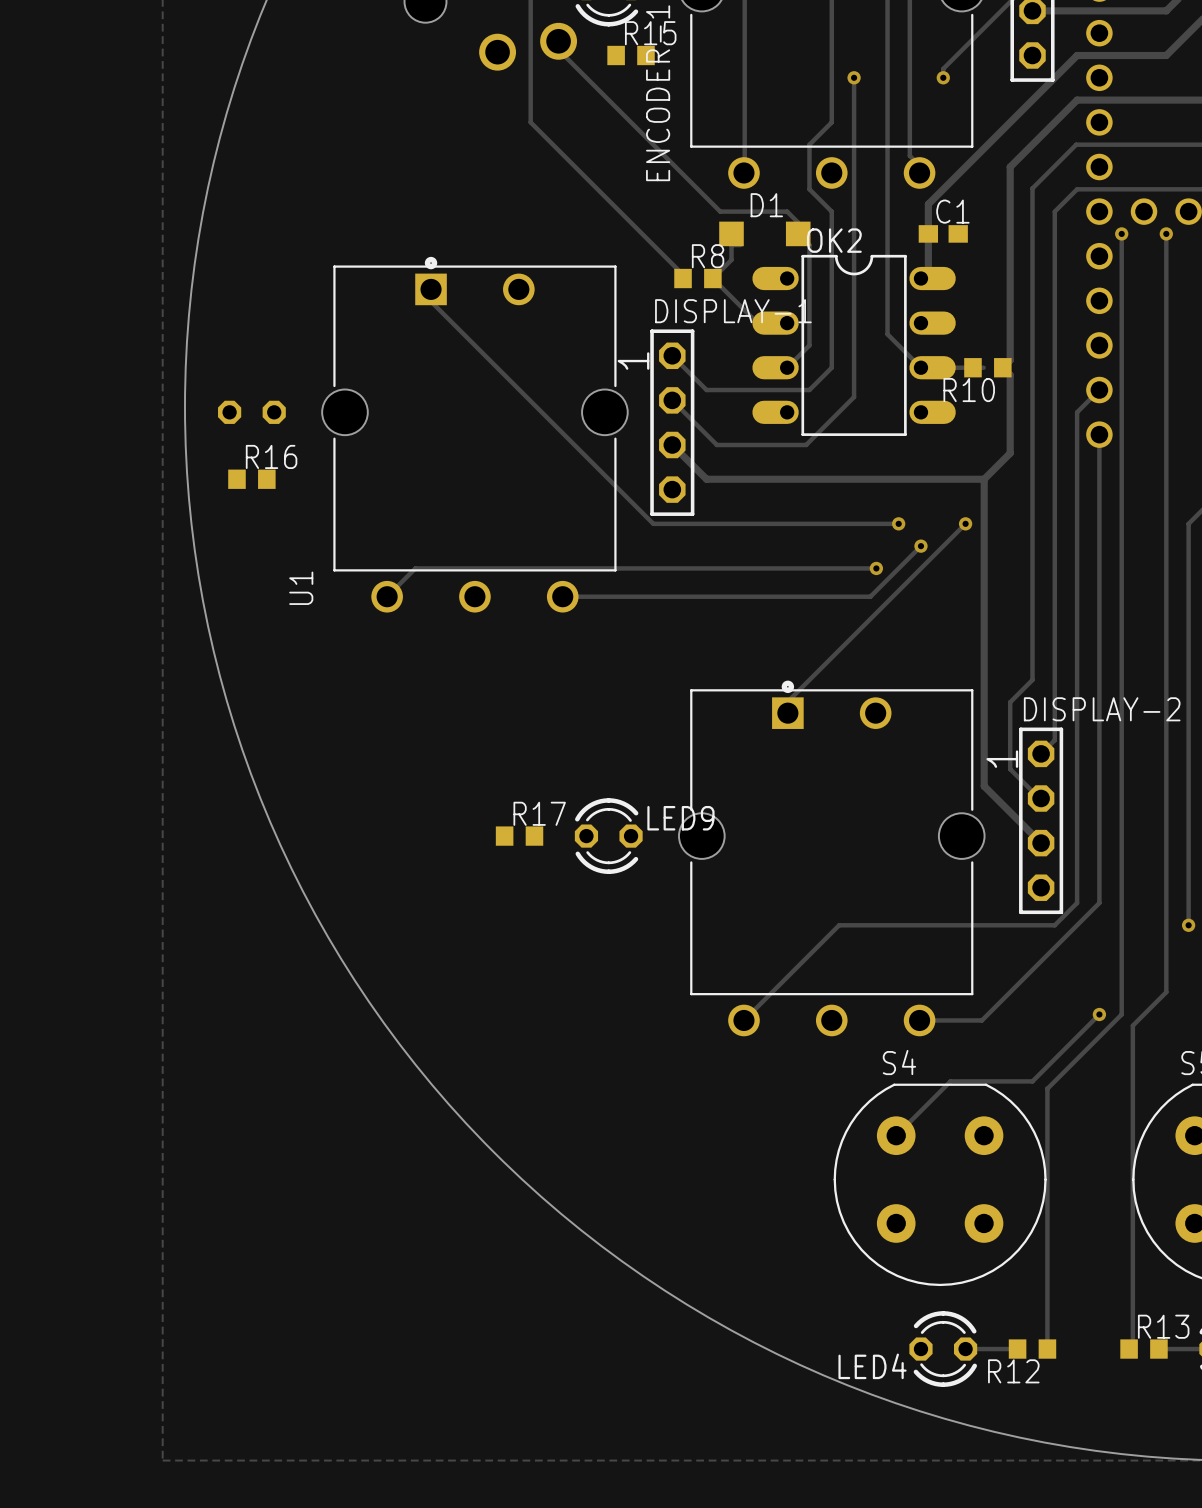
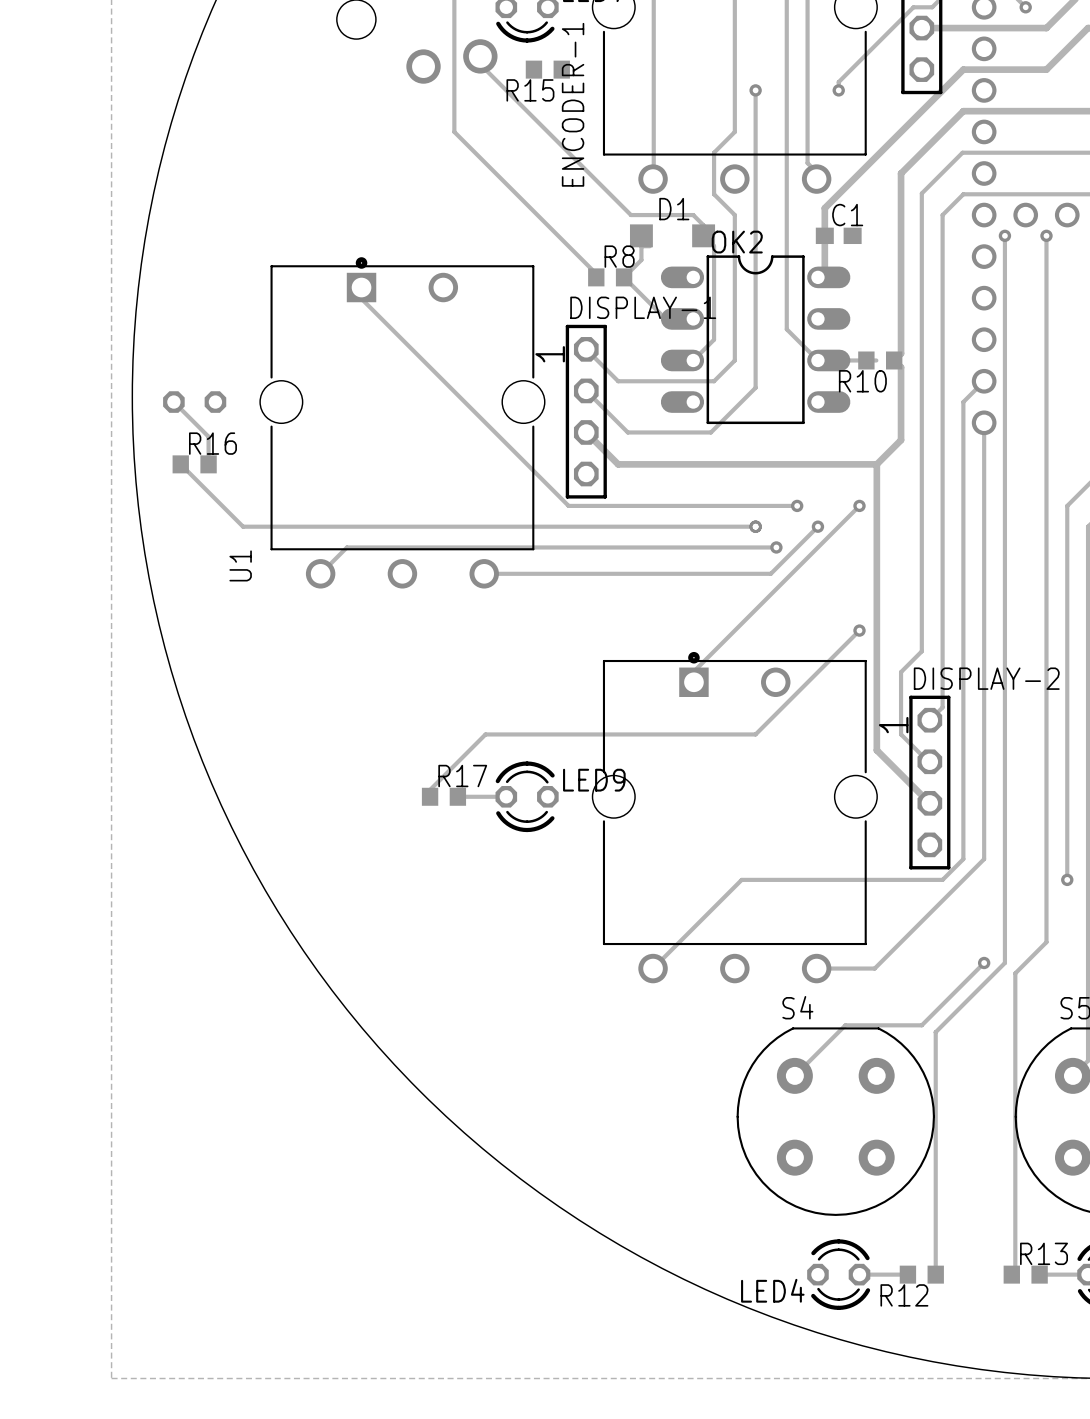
R15 name position: R15 (650, 33) -> R15 (530, 90)
track: none -> (173, 402) (208, 436) (208, 464)
track: none -> (180, 464) (243, 526) (755, 526)
via: none -> (755, 526)
track: none -> (859, 630) (755, 734) (485, 734) (430, 789) (430, 796)
via: none -> (859, 630)
track: none -> (457, 796) (506, 796)

